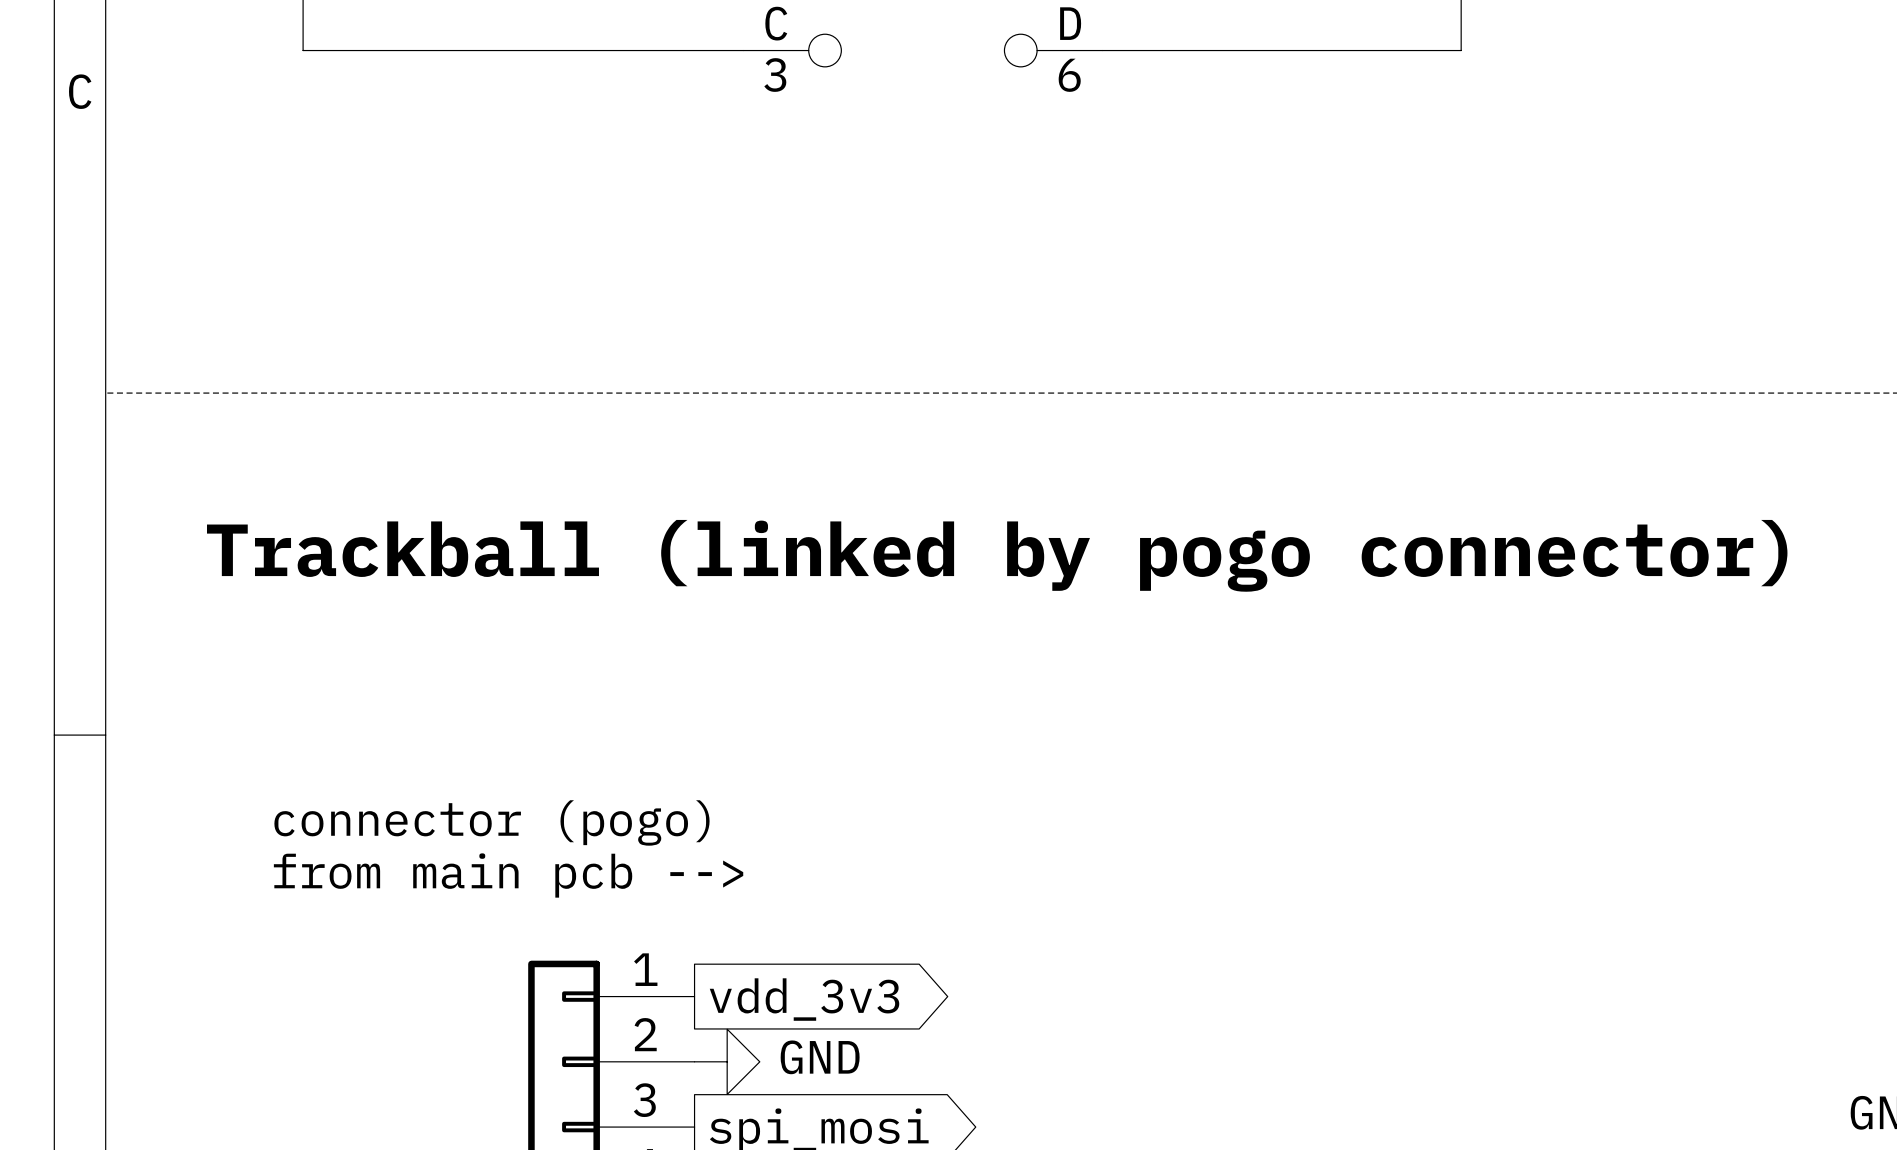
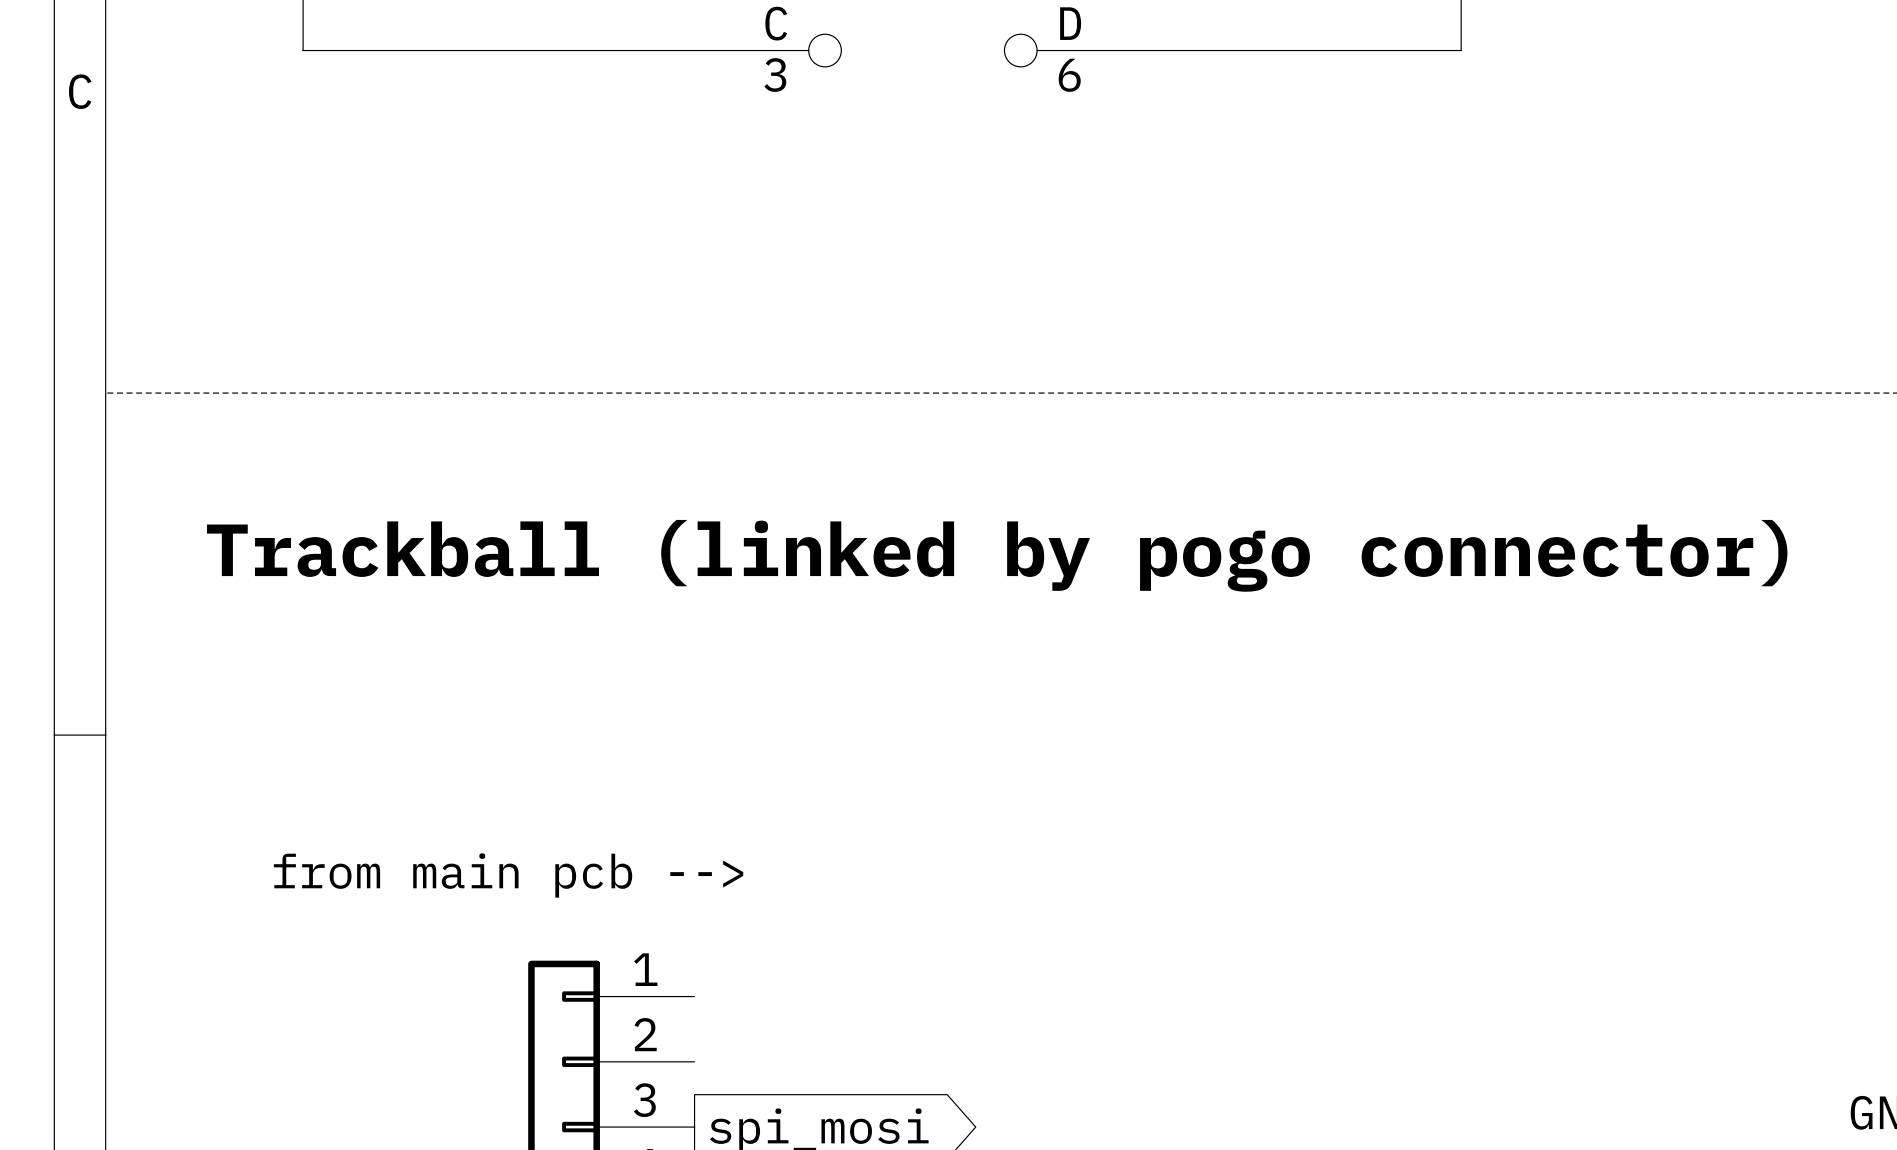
text: connector (pogo) (491, 822) -> none
global label: vdd_3v3 (804, 999) -> none
power symbol: GND (727, 1061) -> none

